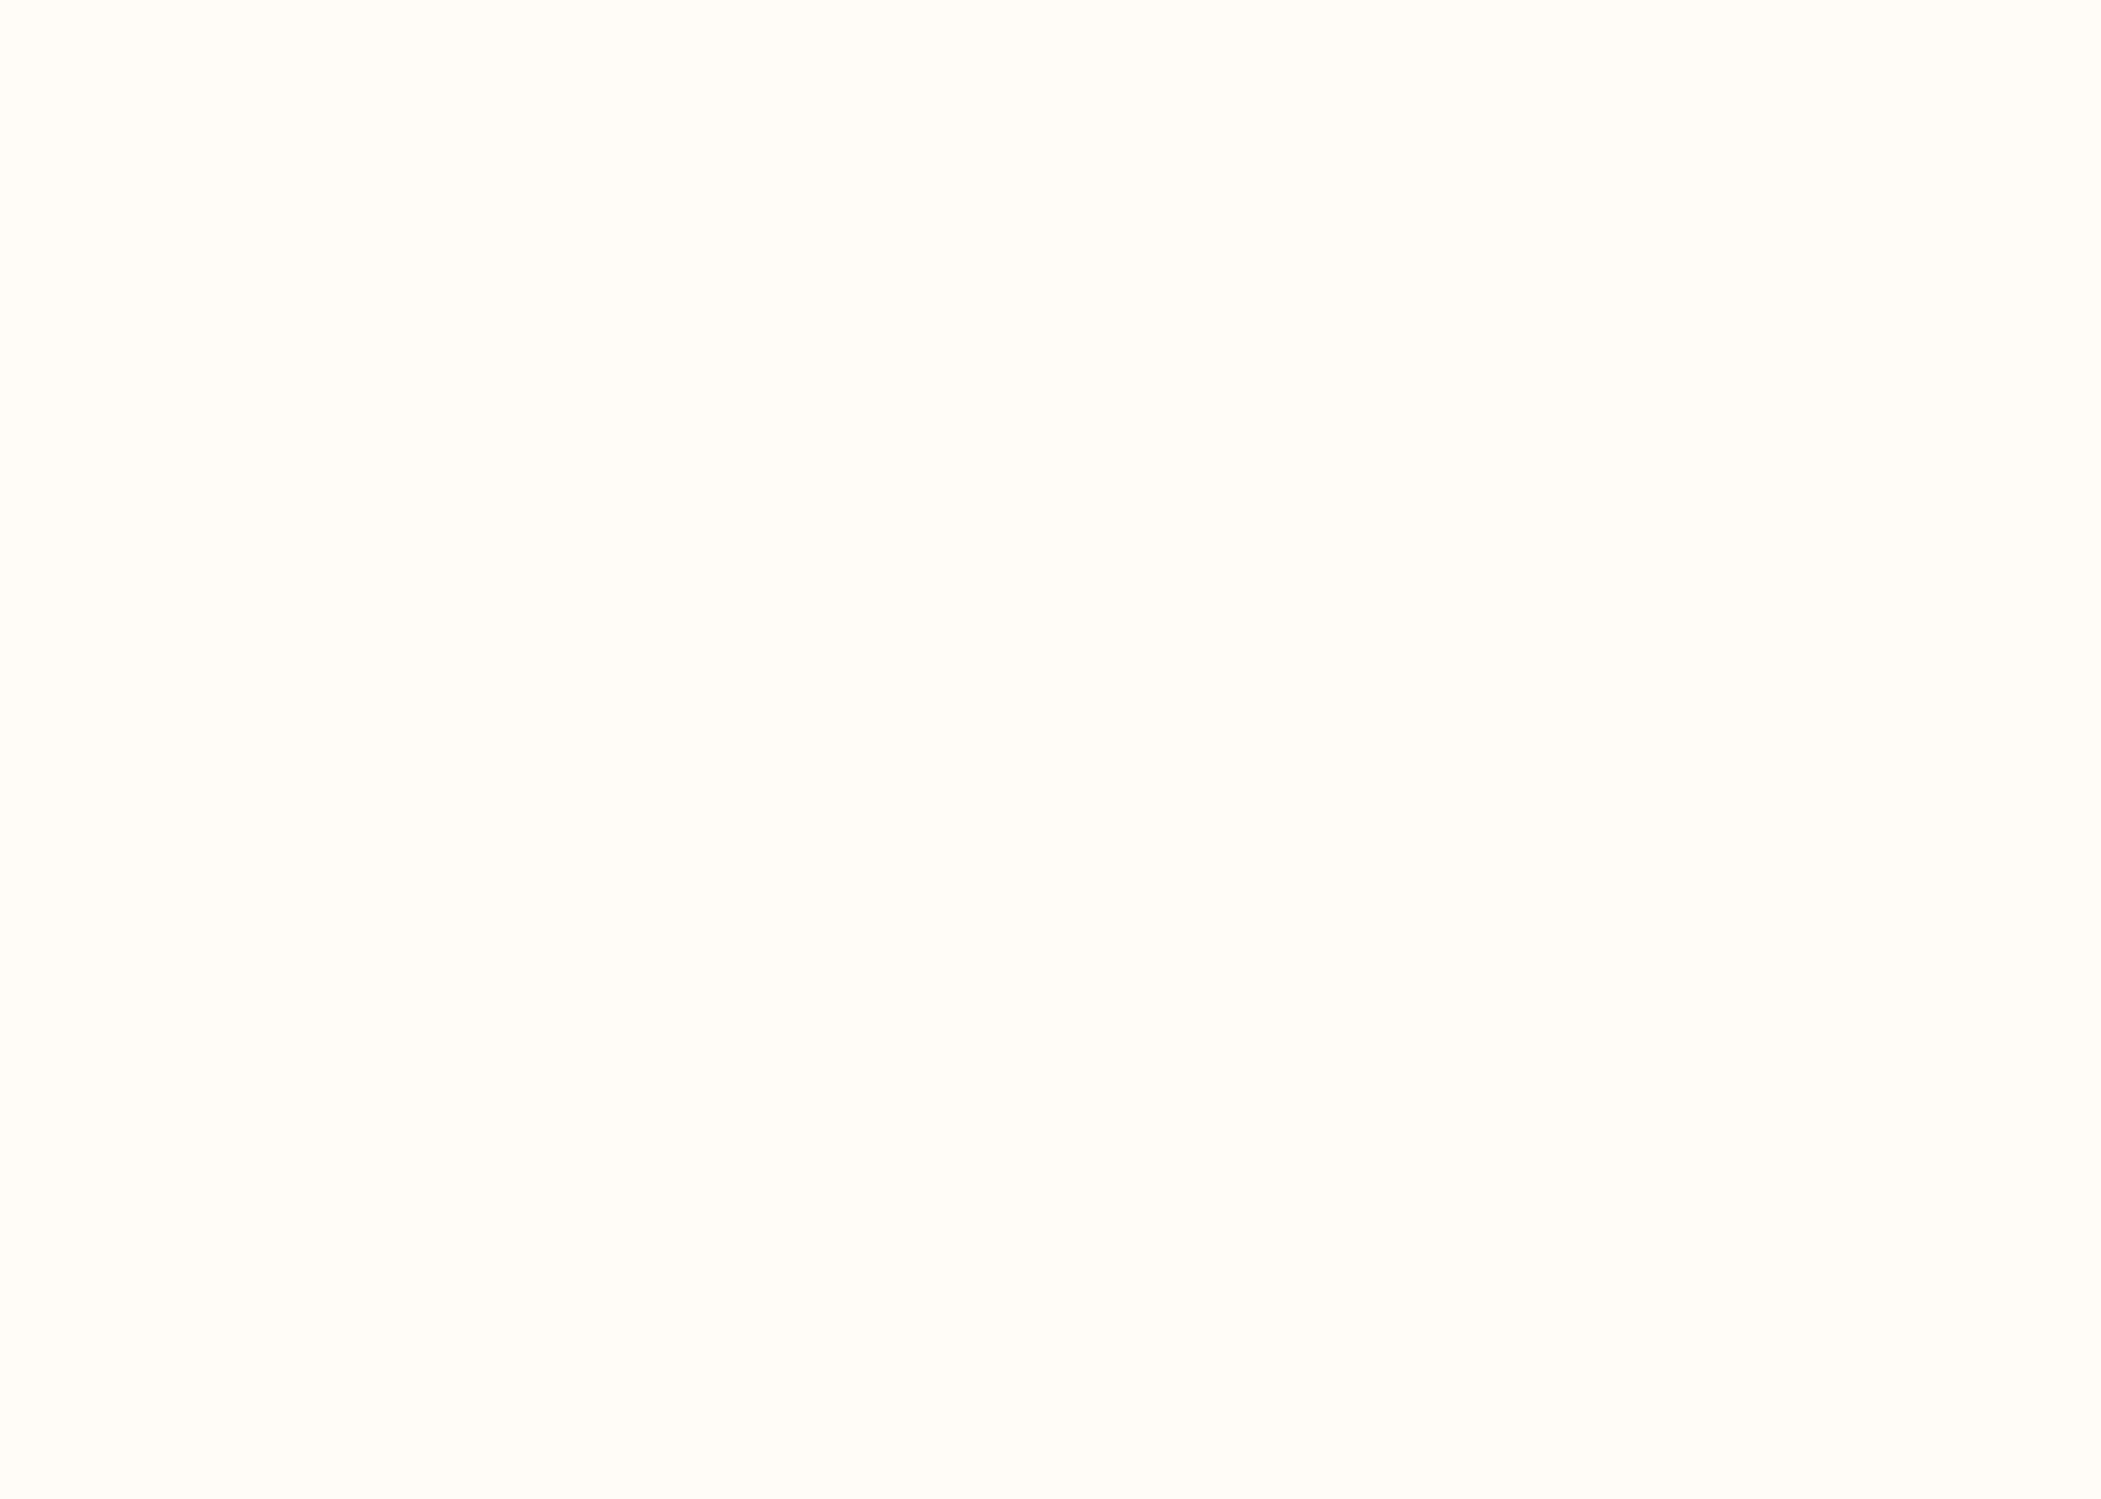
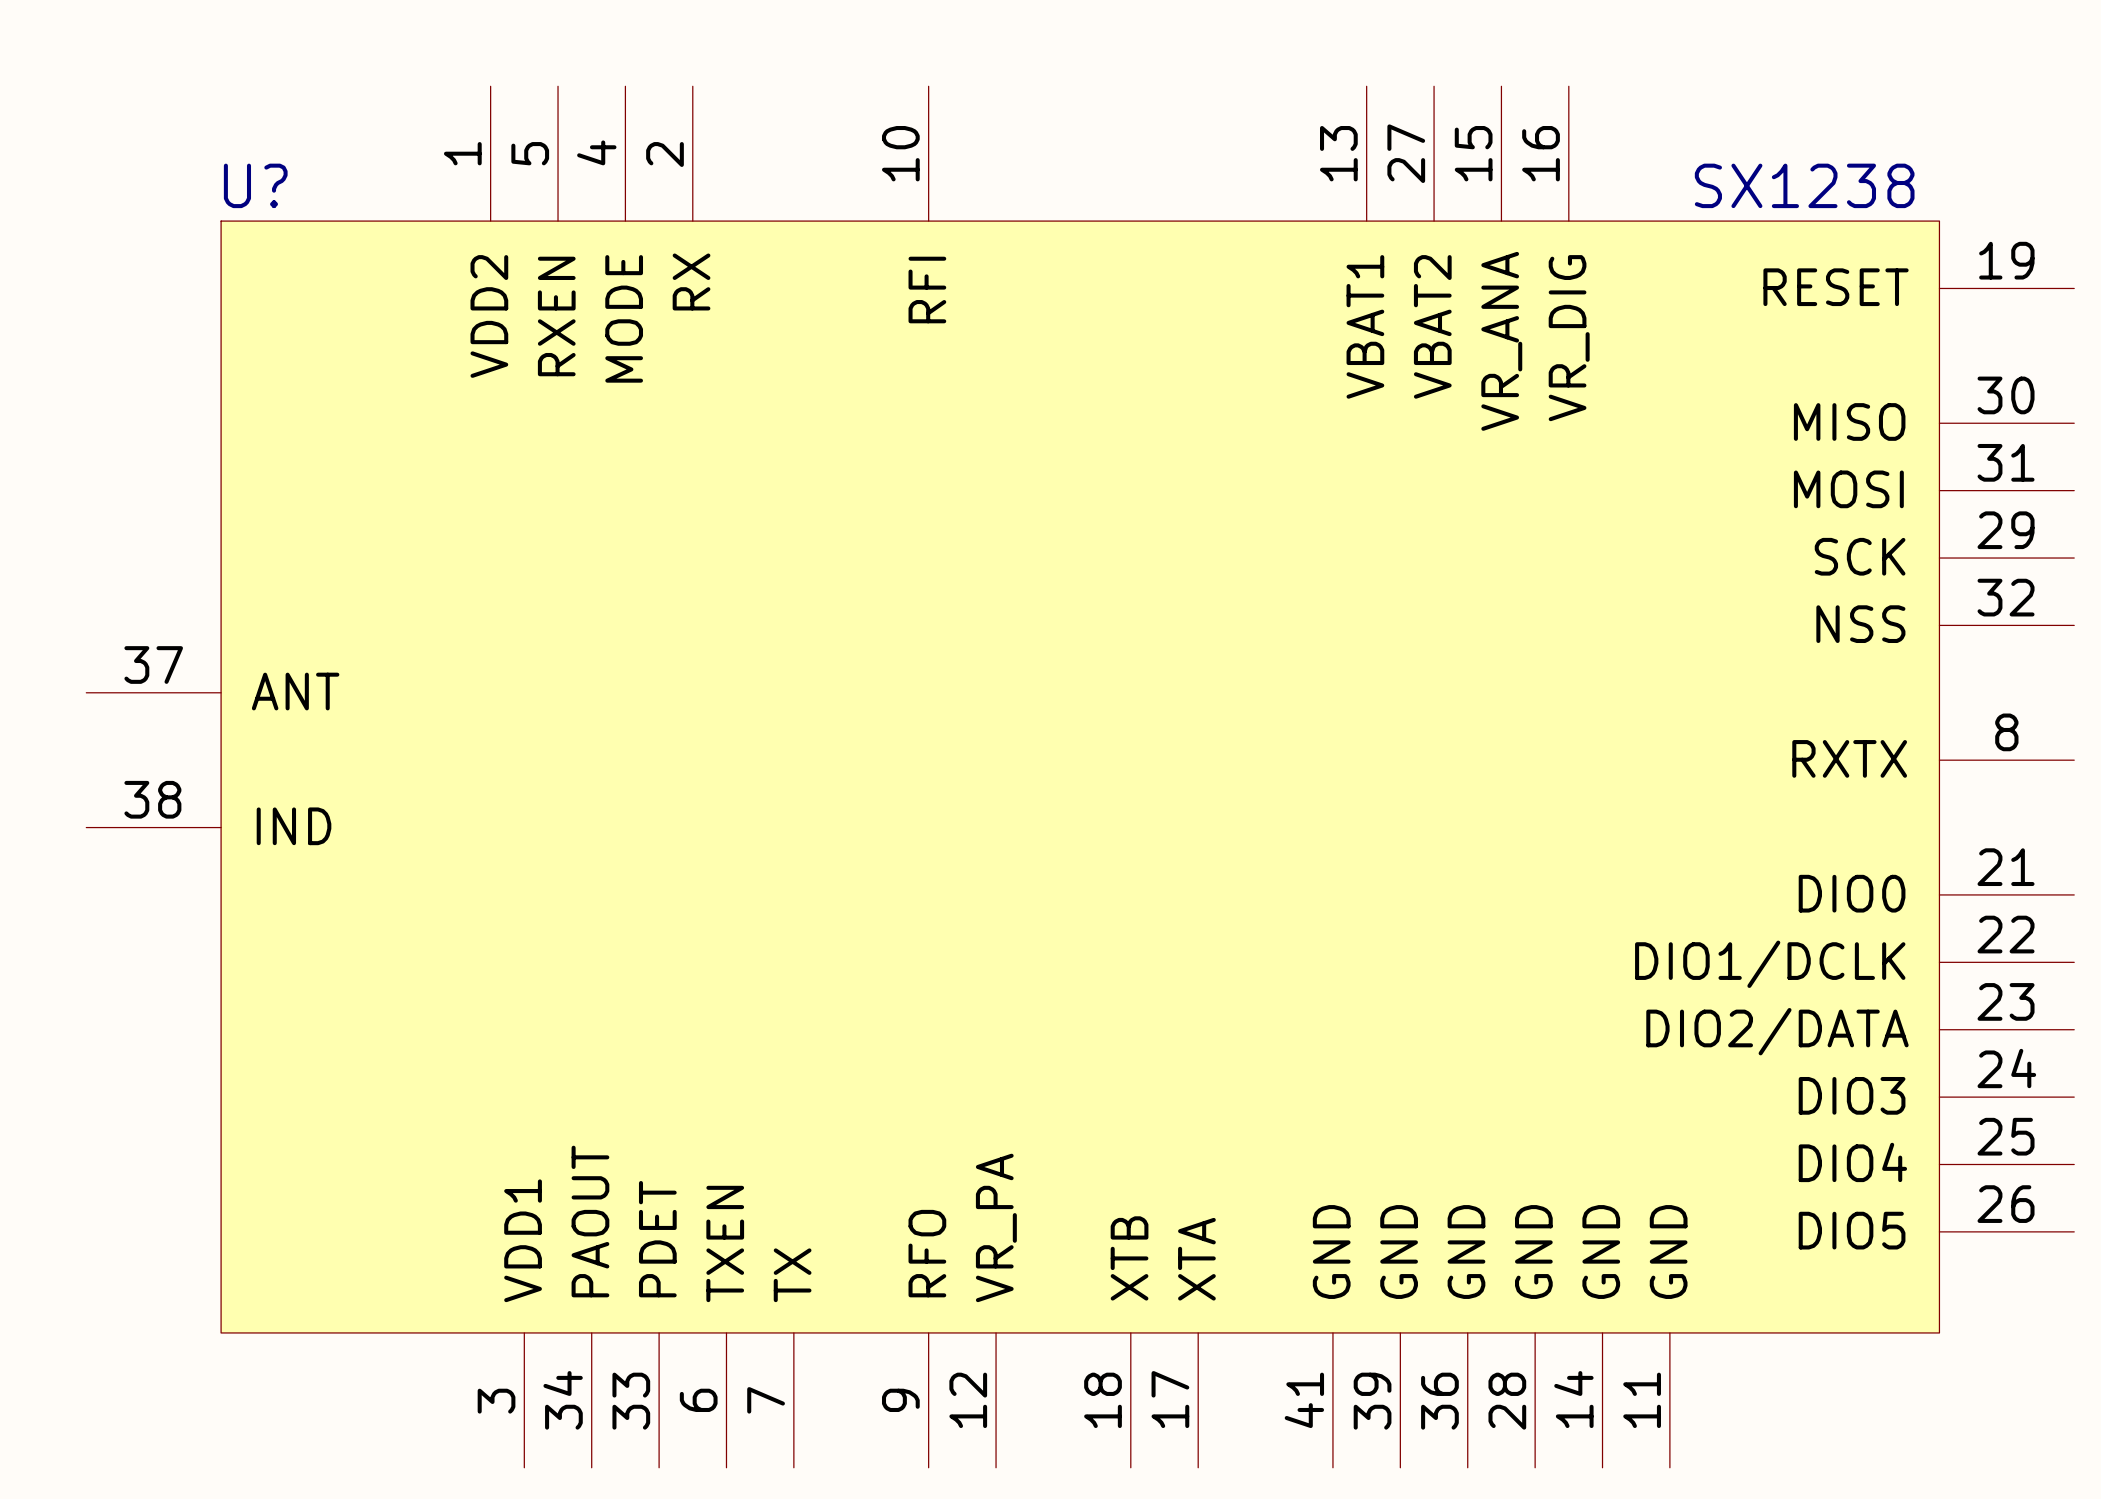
U?: none -> SX1238 (1080, 777)

